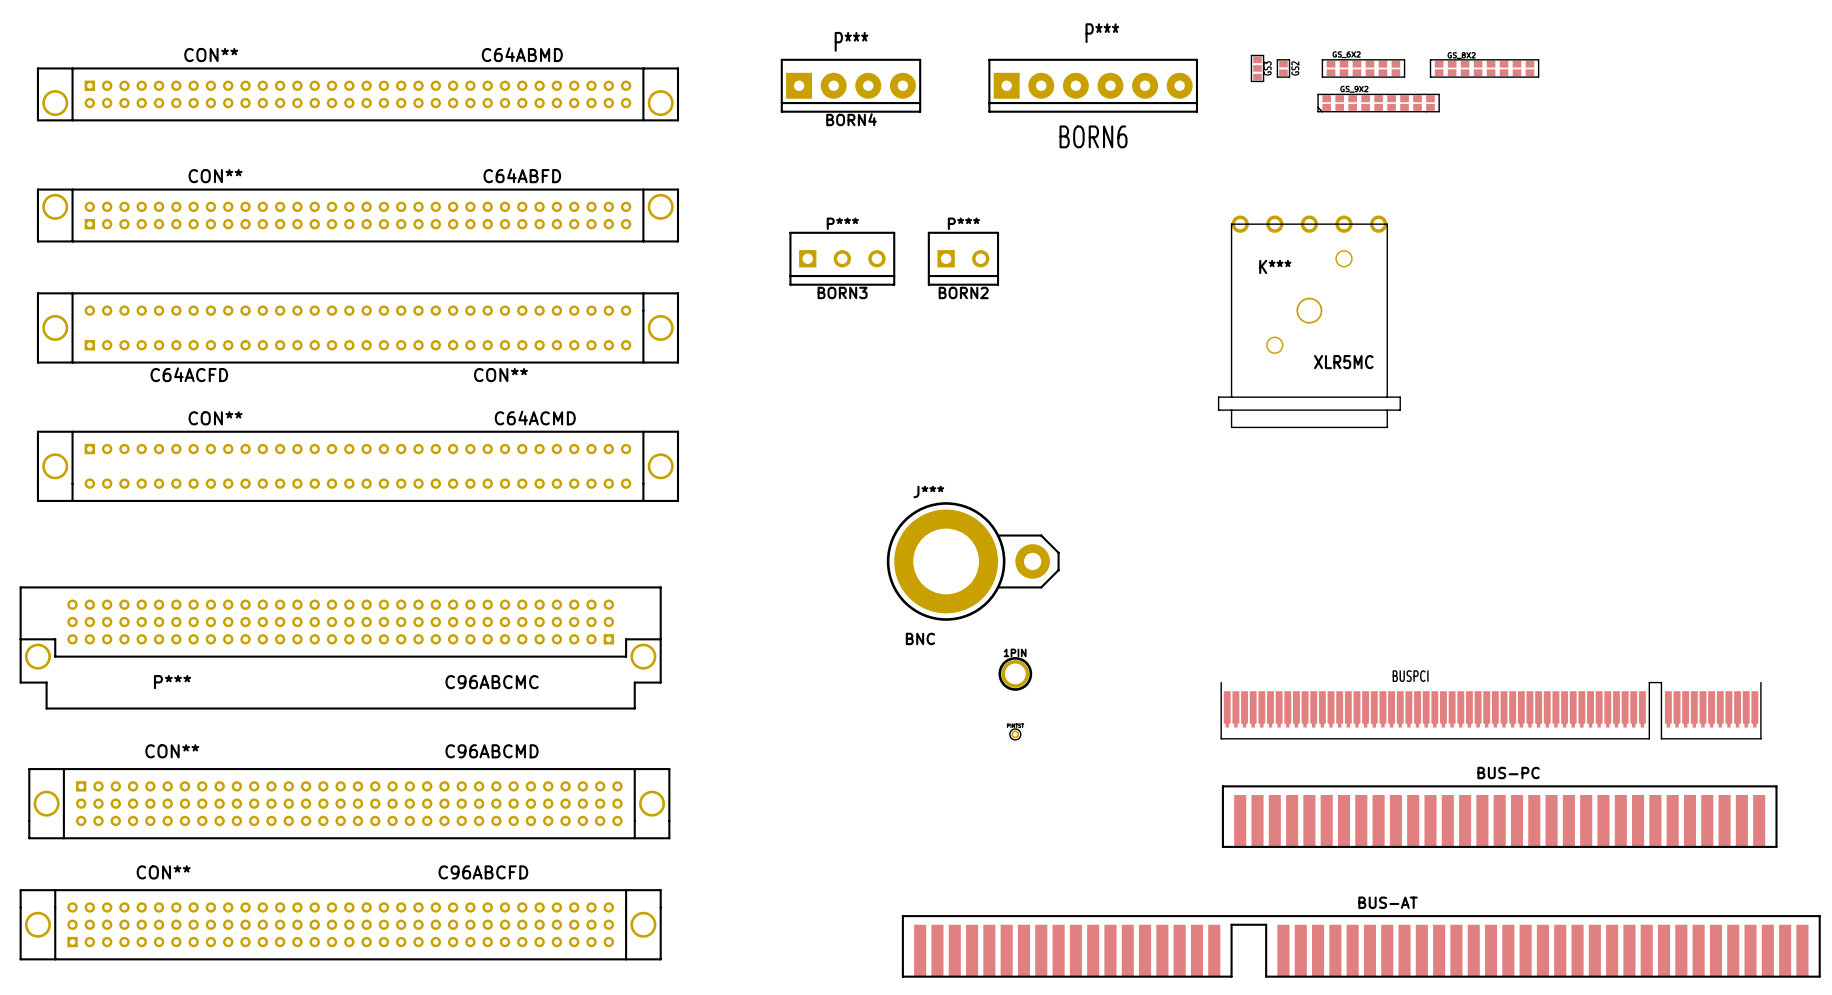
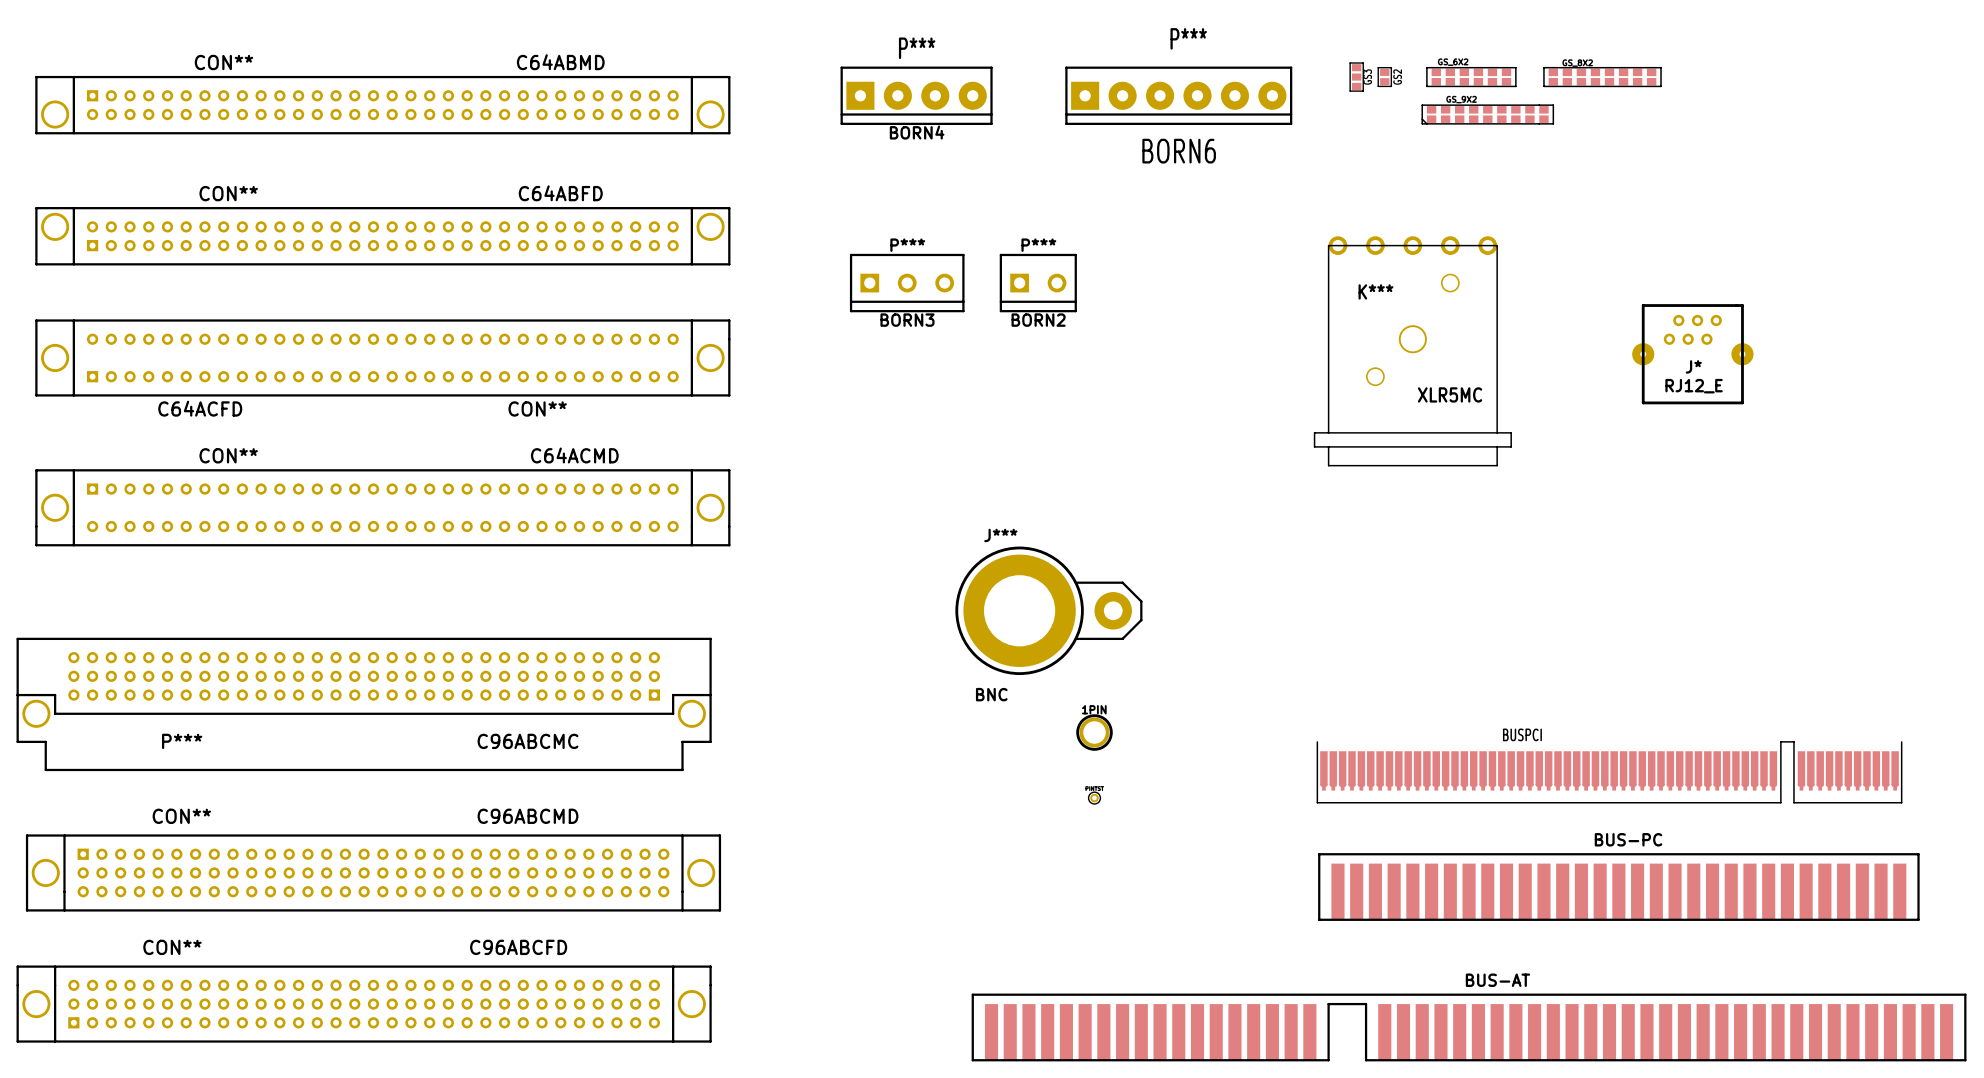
RJ12_E: none -> J* (1692, 354)

